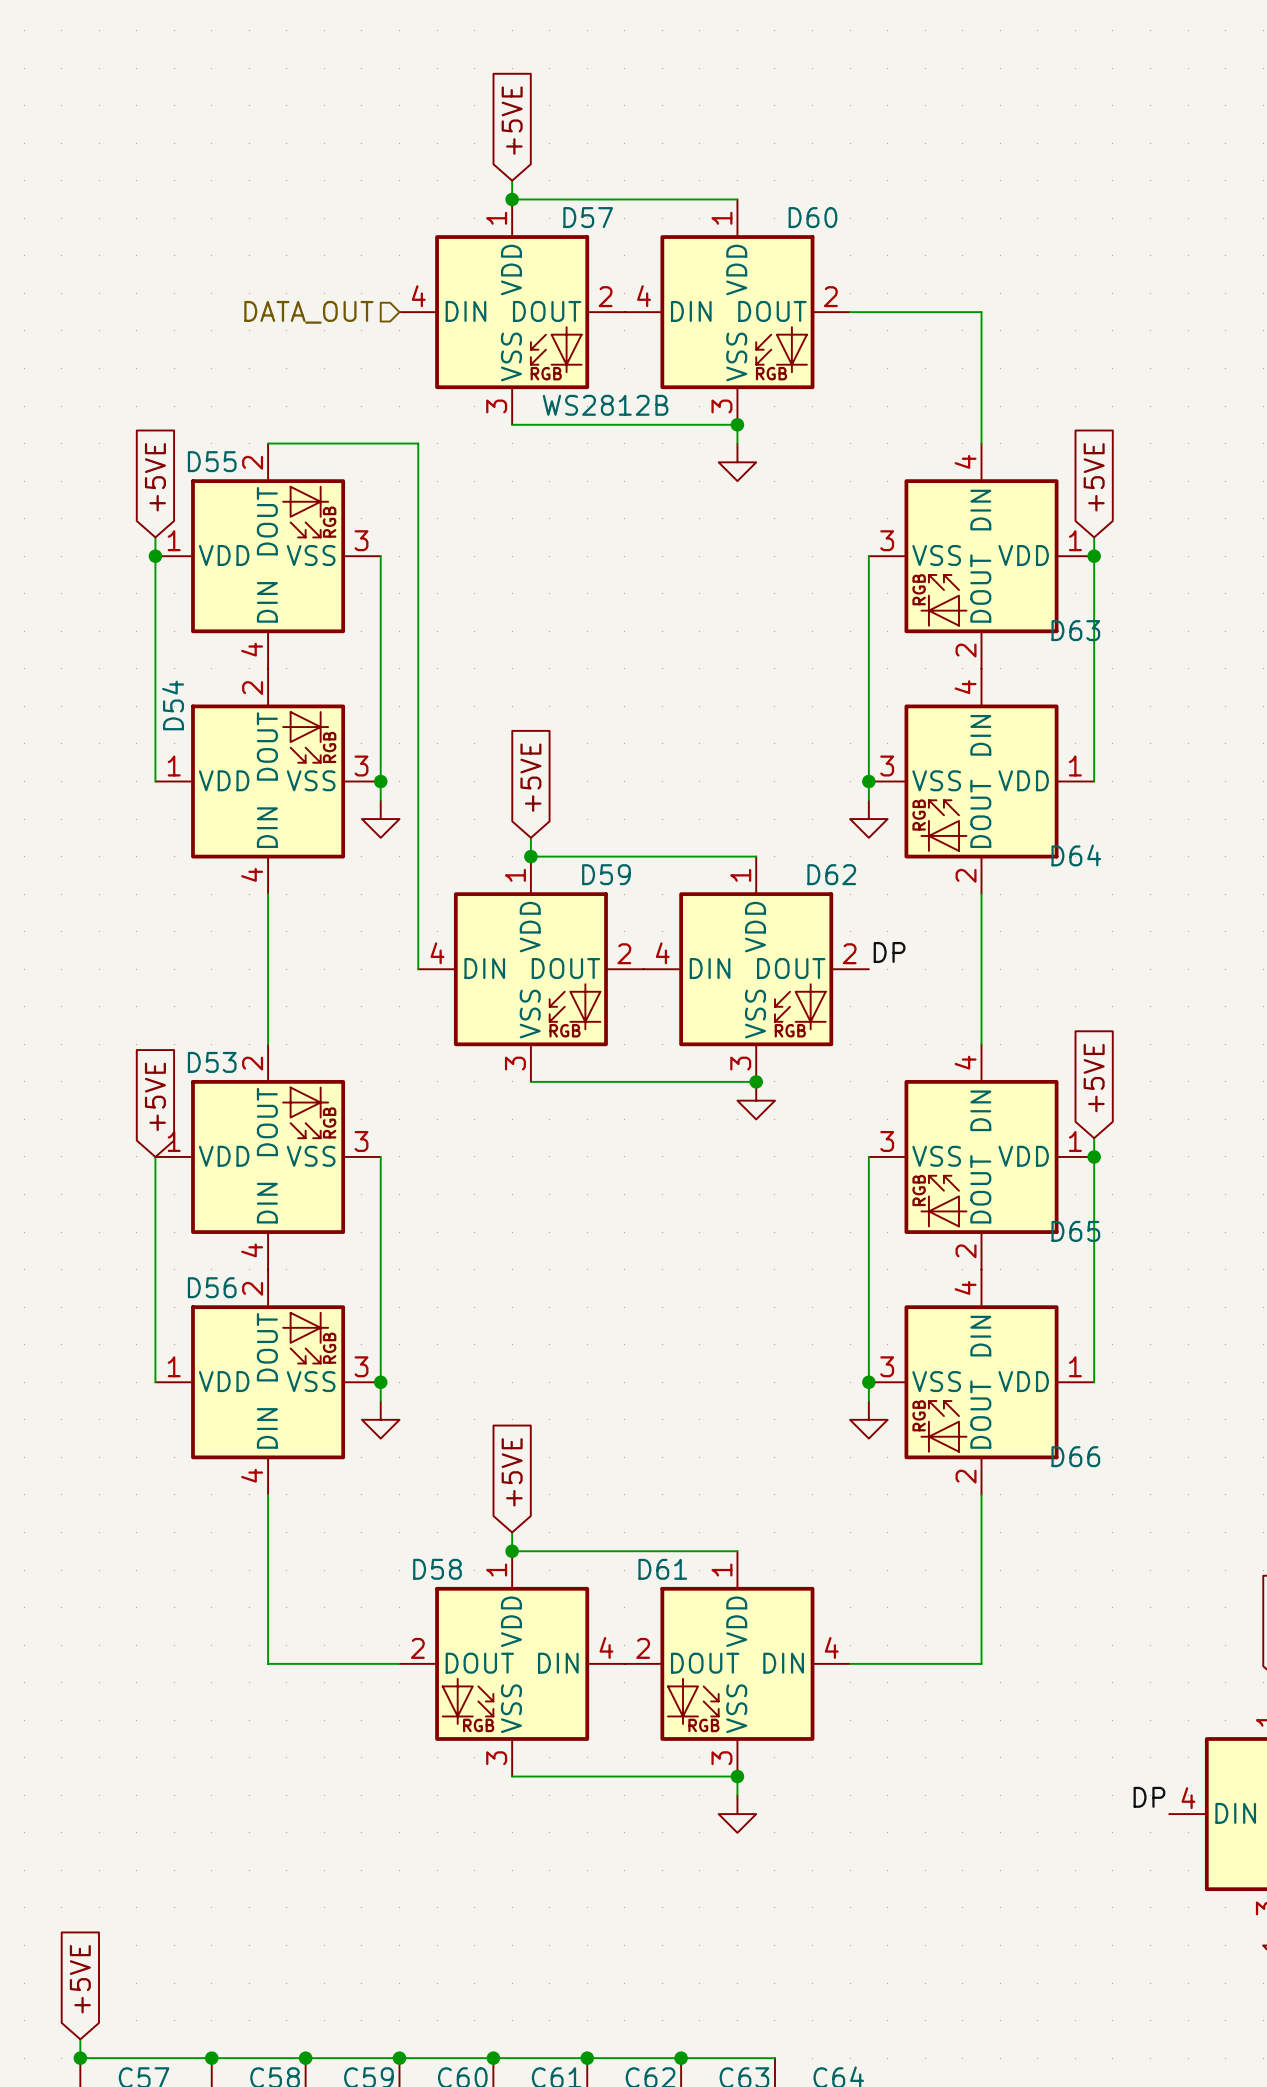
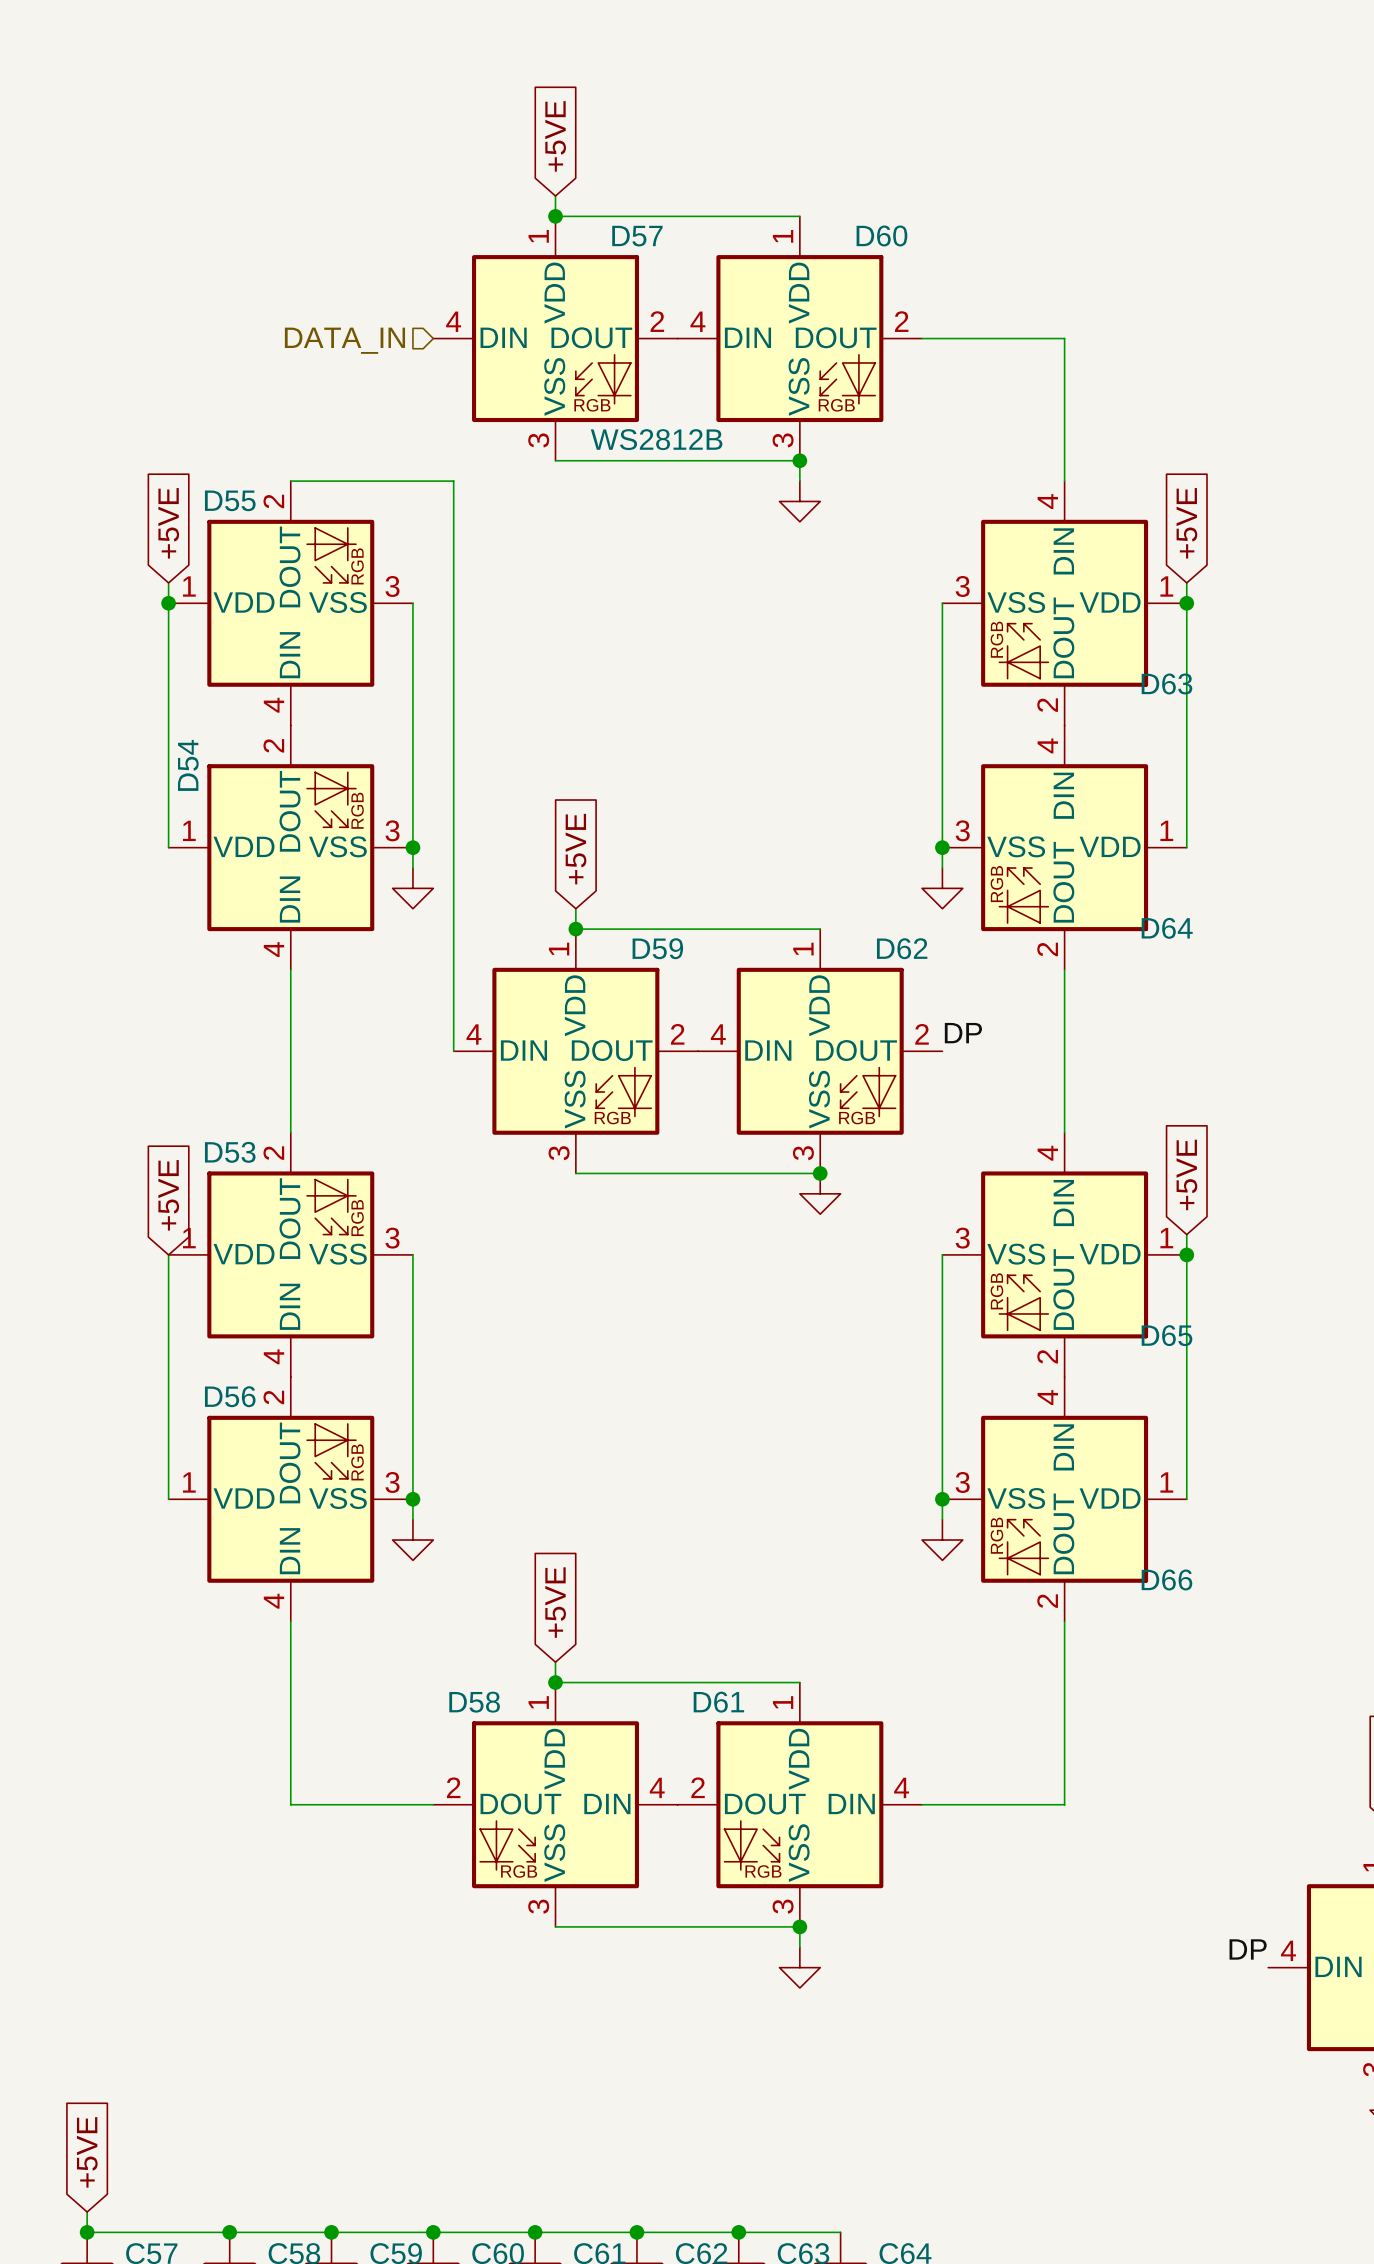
hierarchical label: DATA_OUT (308, 312) -> DATA_IN (344, 340)

